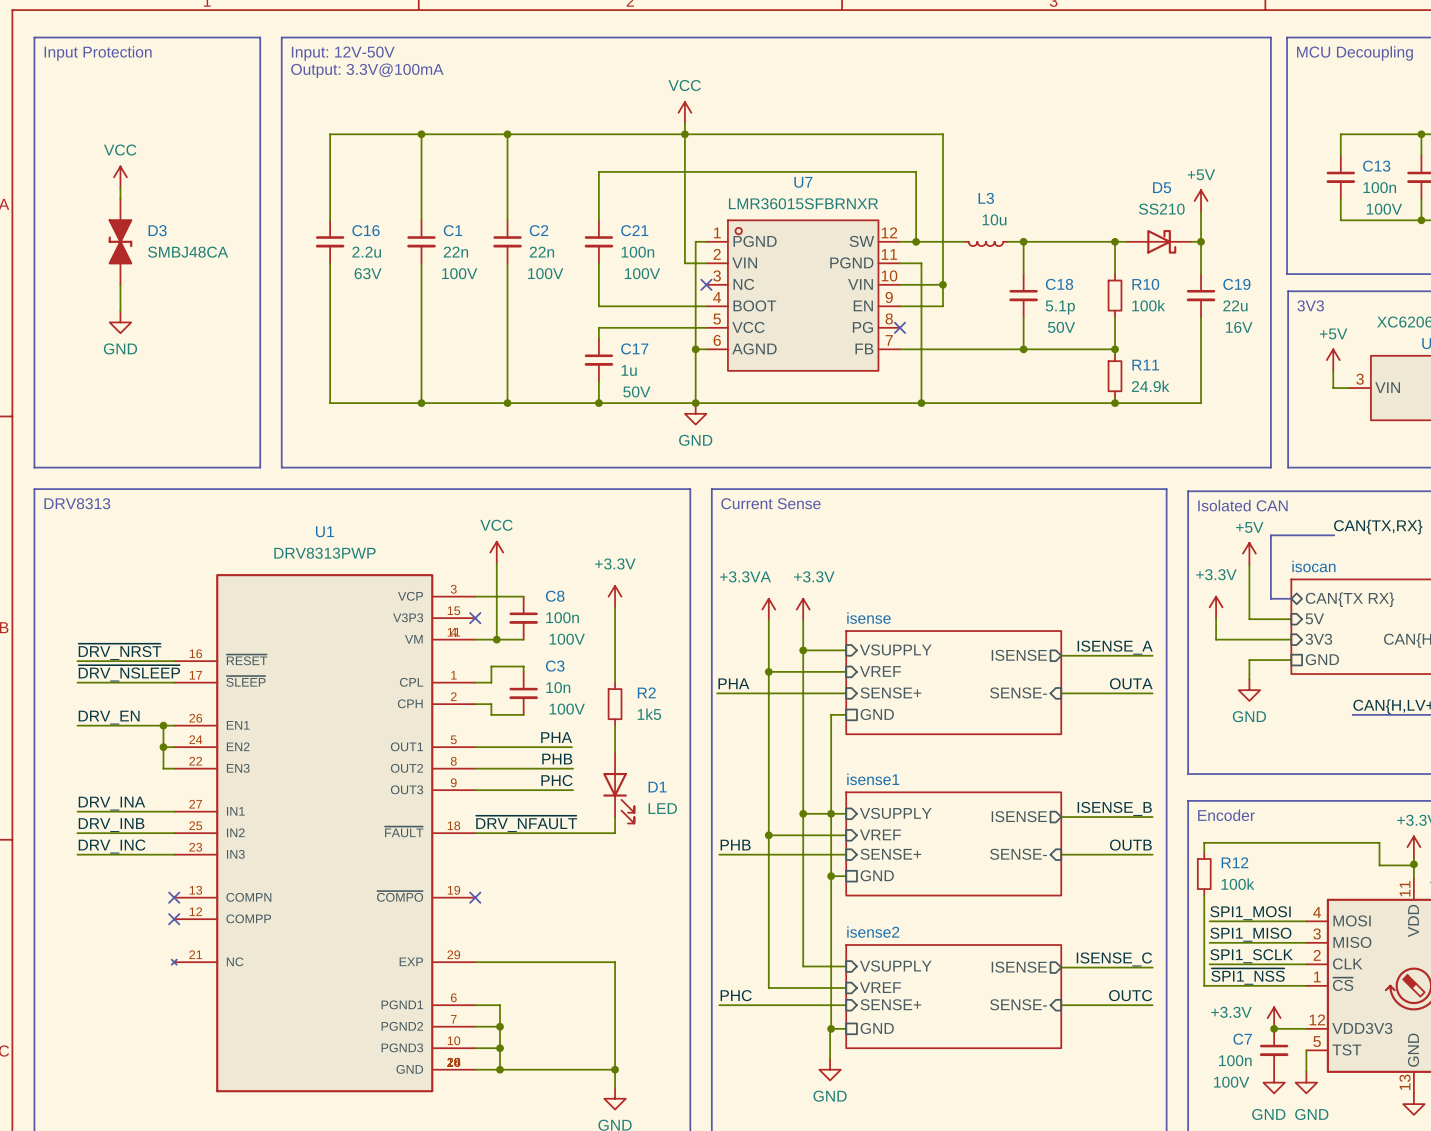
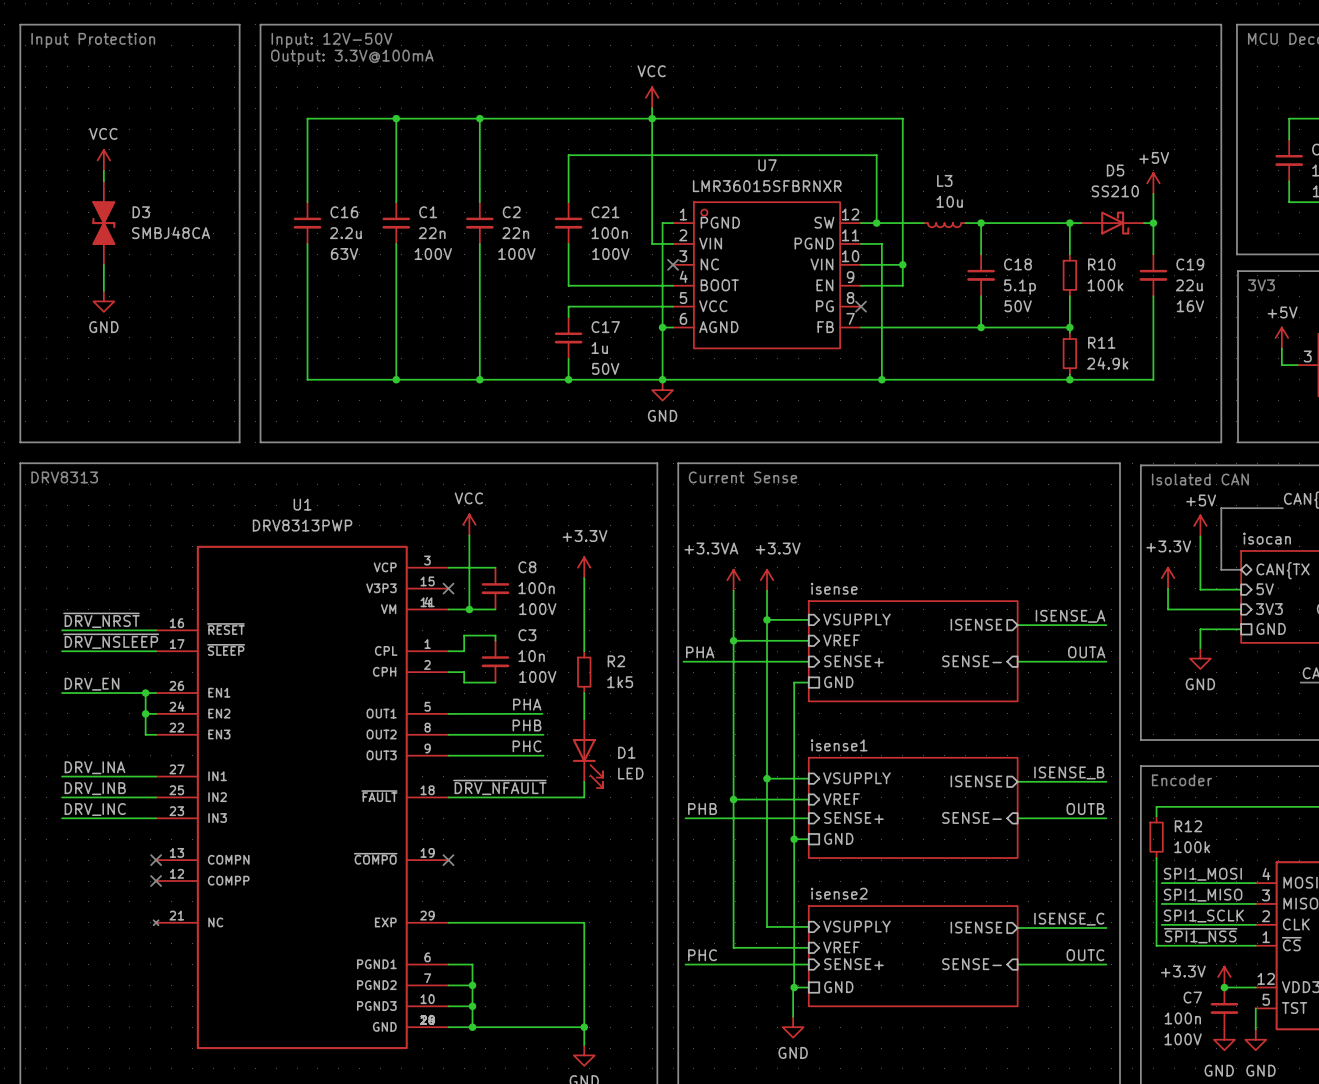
junction: (831, 813) -> none

